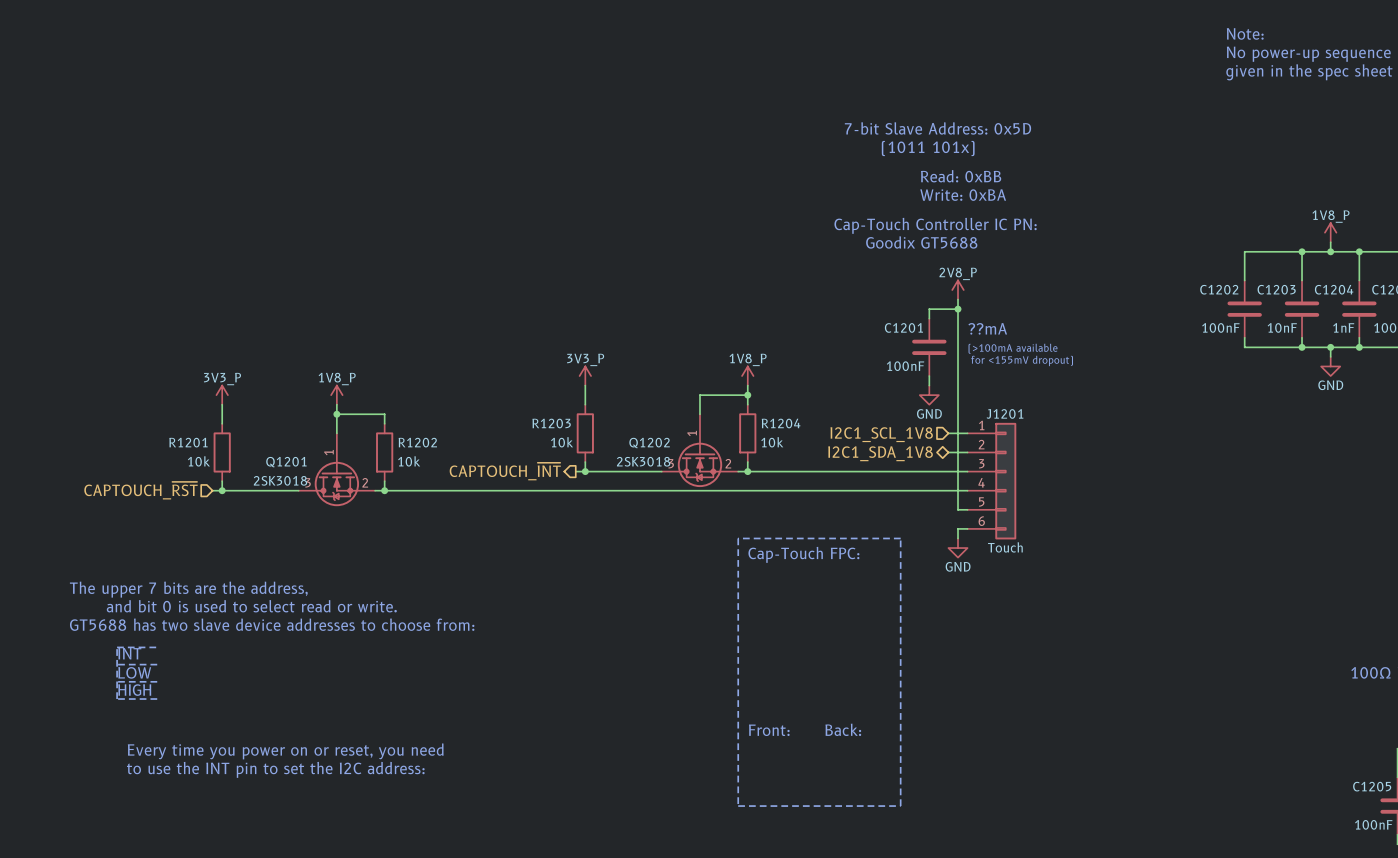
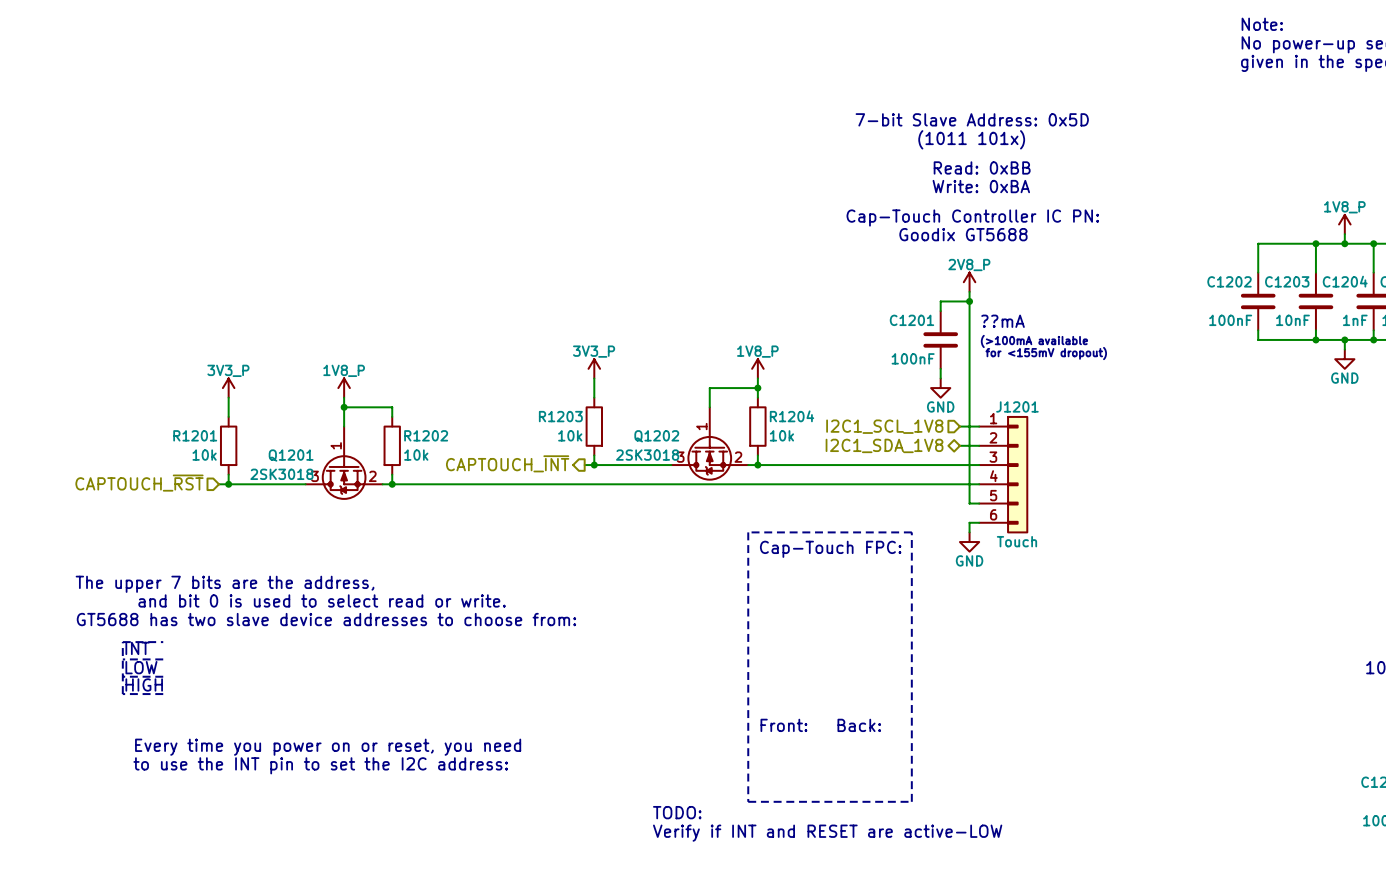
text: none -> TODO: (677, 812)
text: none -> Verify if INT and RESET are active-LOW (827, 833)

